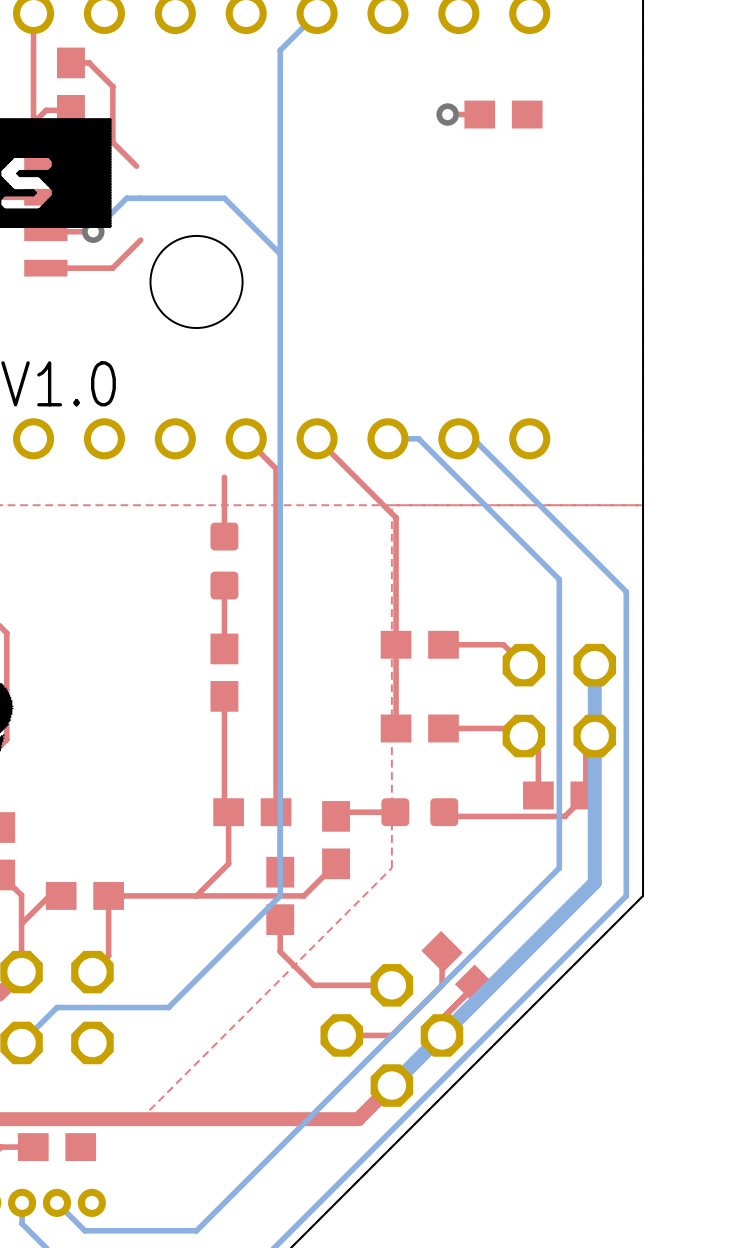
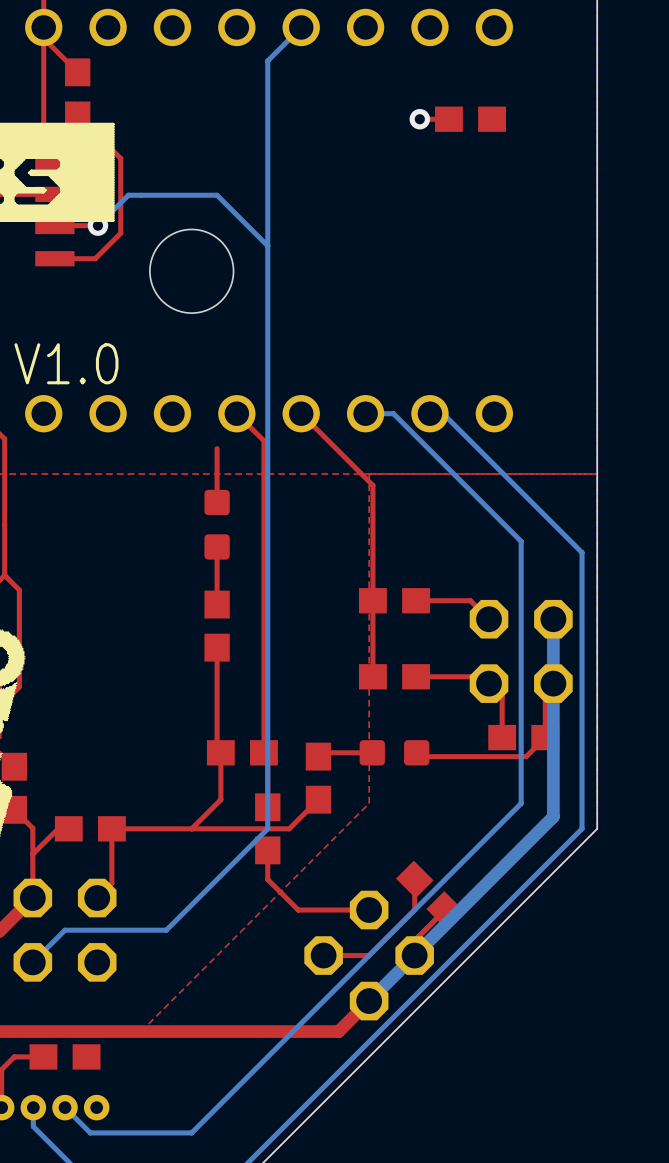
top track: (70, 62) (89, 62) (112, 86) (112, 142) (136, 166) -> (77, 72) (43, 38)
top track: (70, 110) (46, 110) (33, 122) -> none
top track: (140, 240) (112, 268) (90, 268) -> (80, 108) (77, 115) (120, 158) (120, 233) (95, 258)

